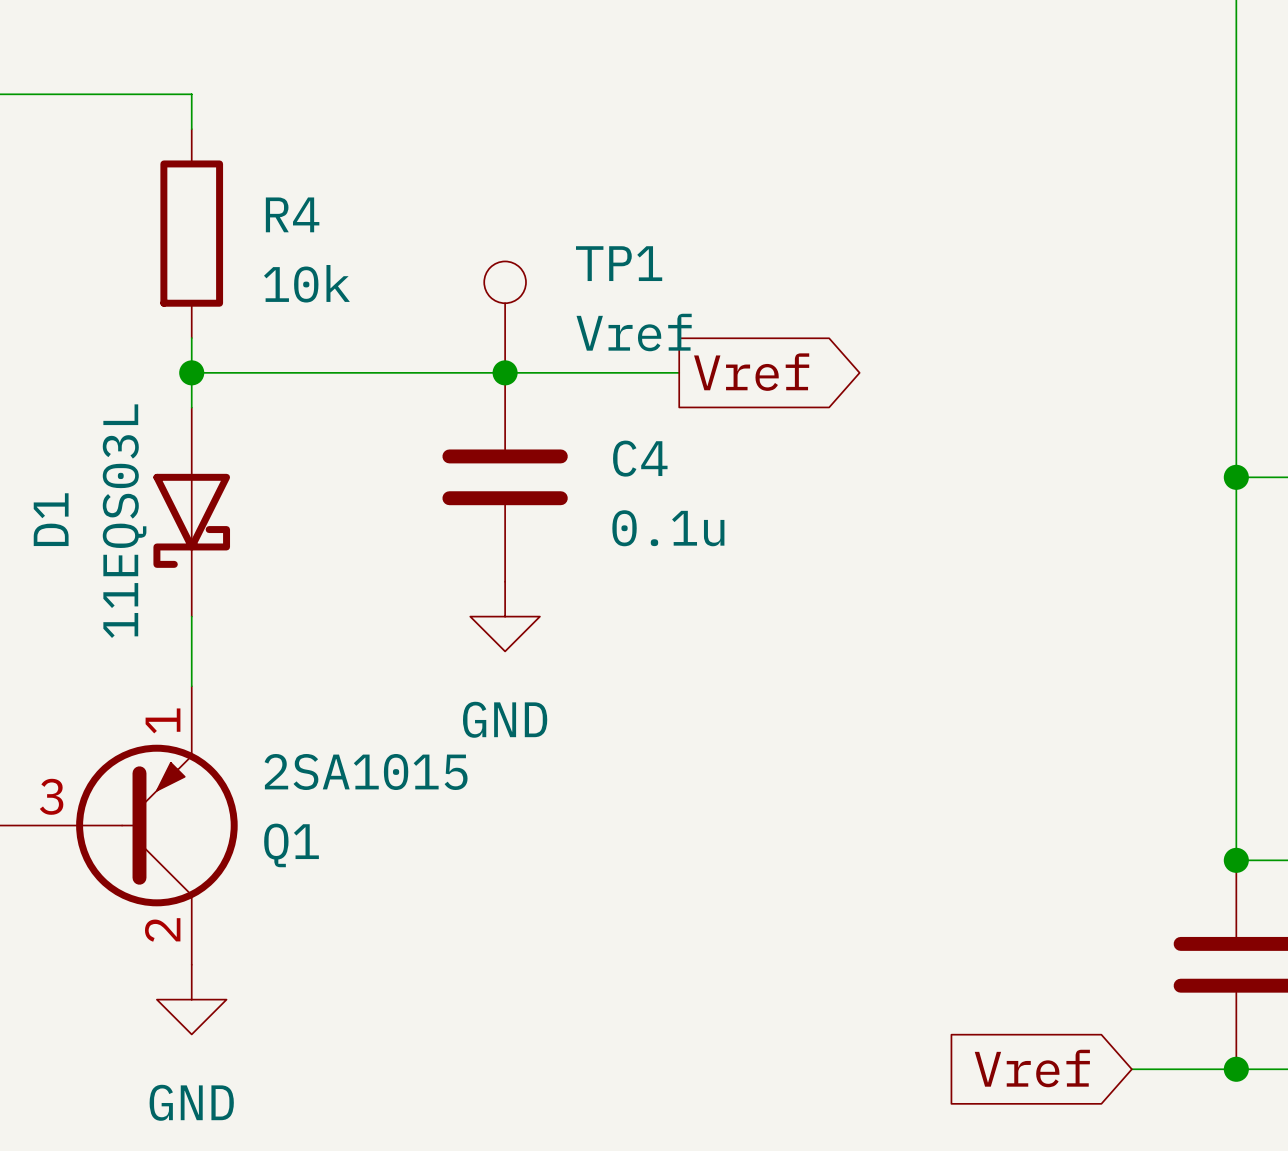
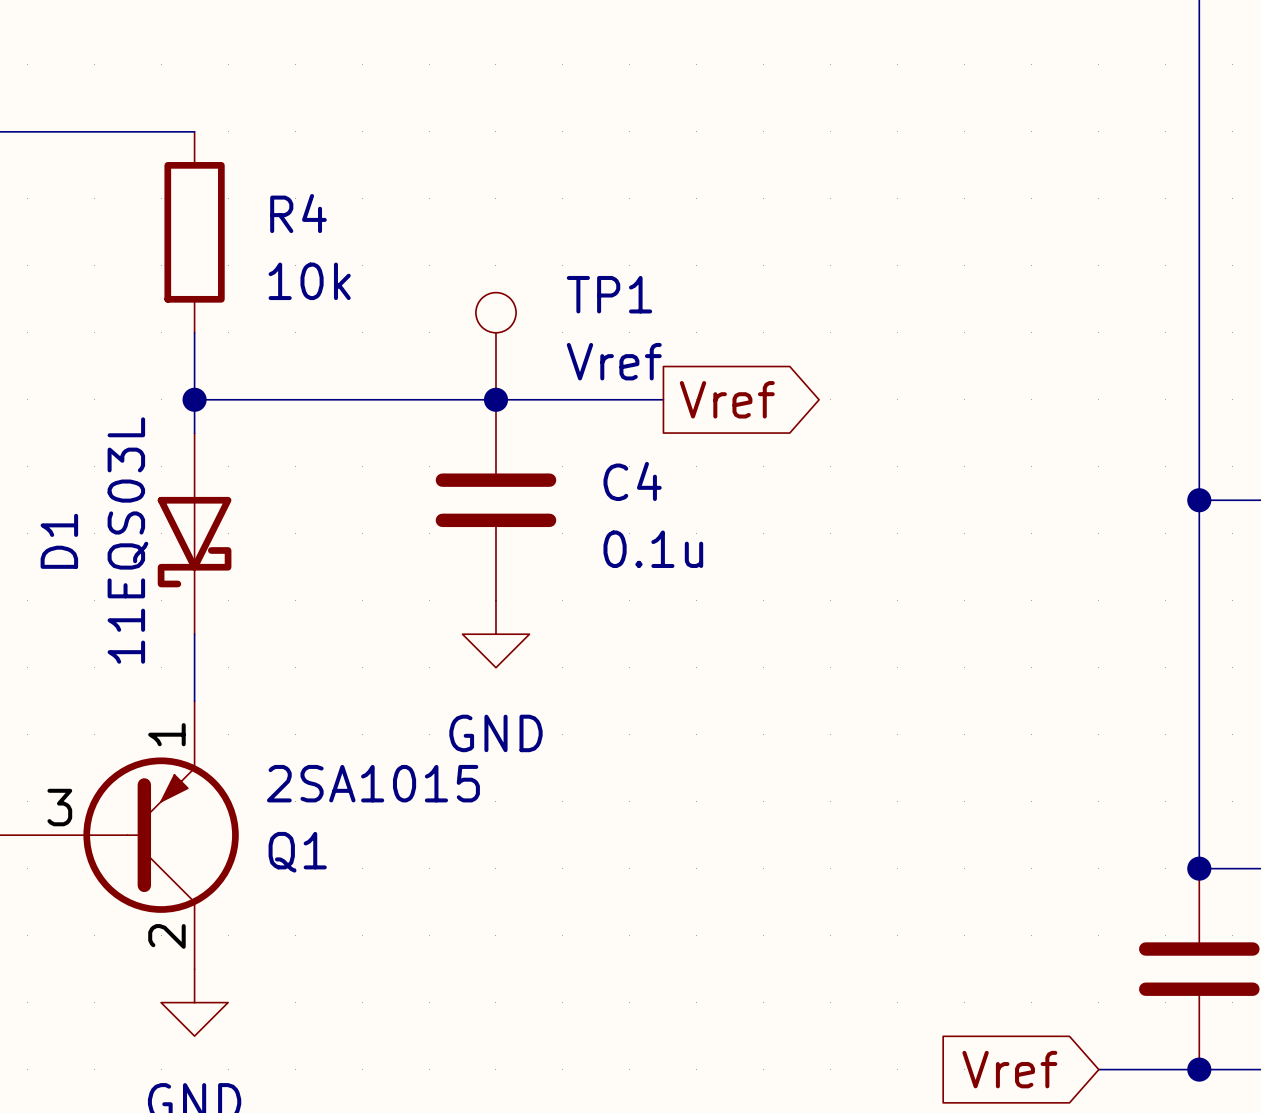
R4 position: (191, 233) -> (194, 232)

